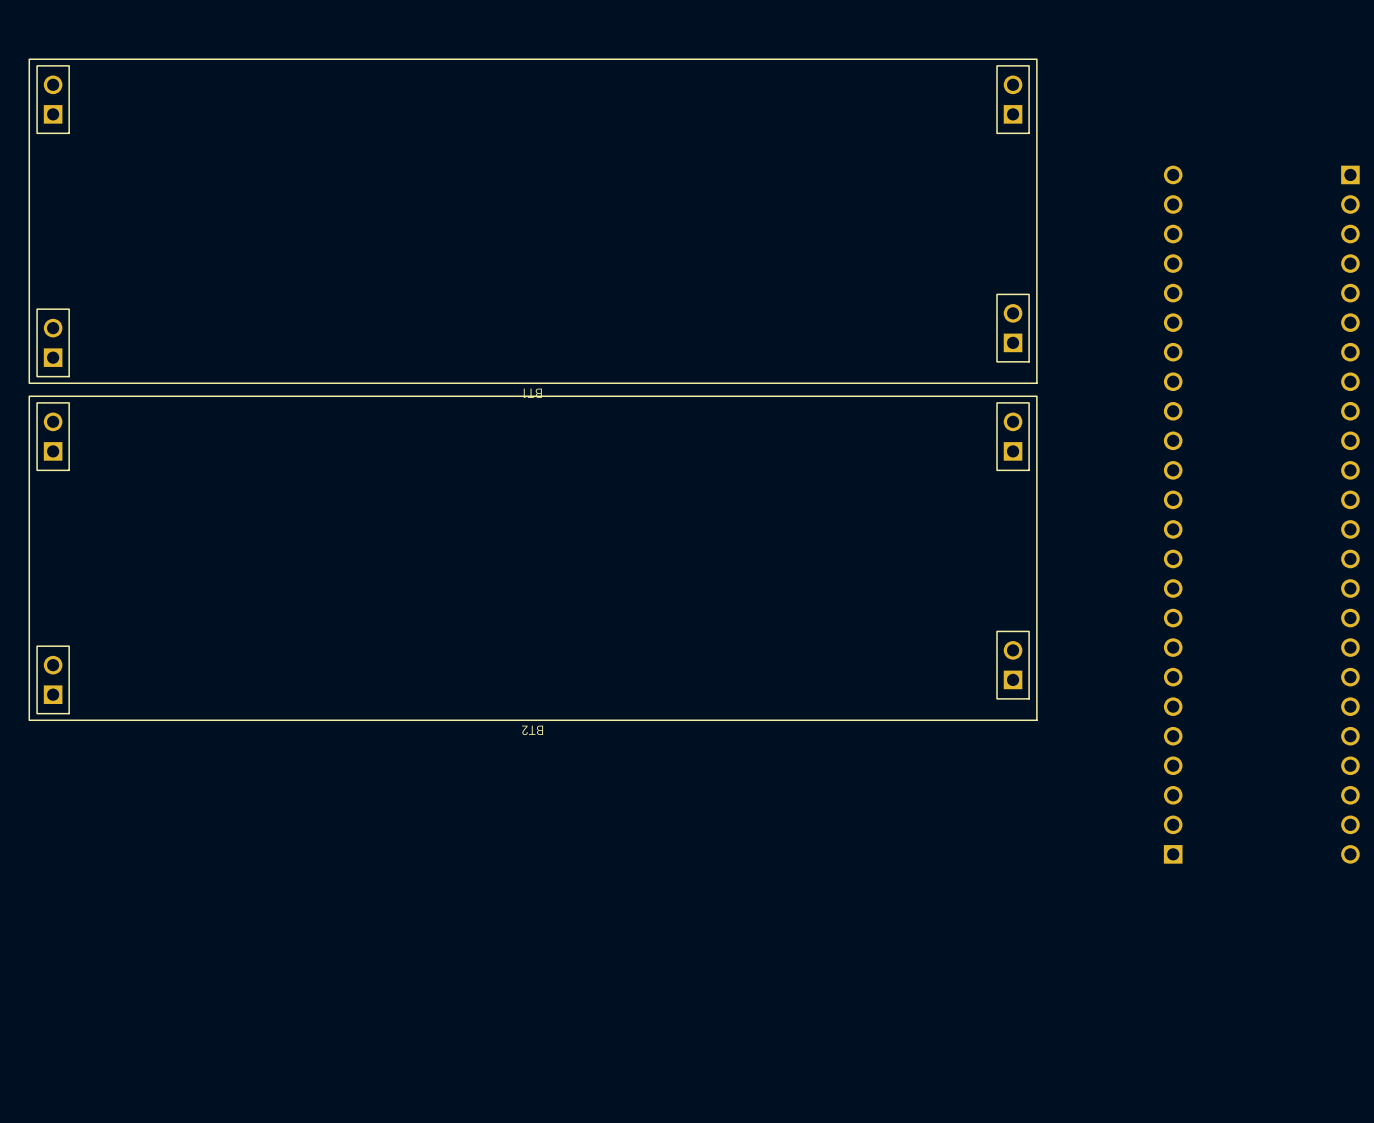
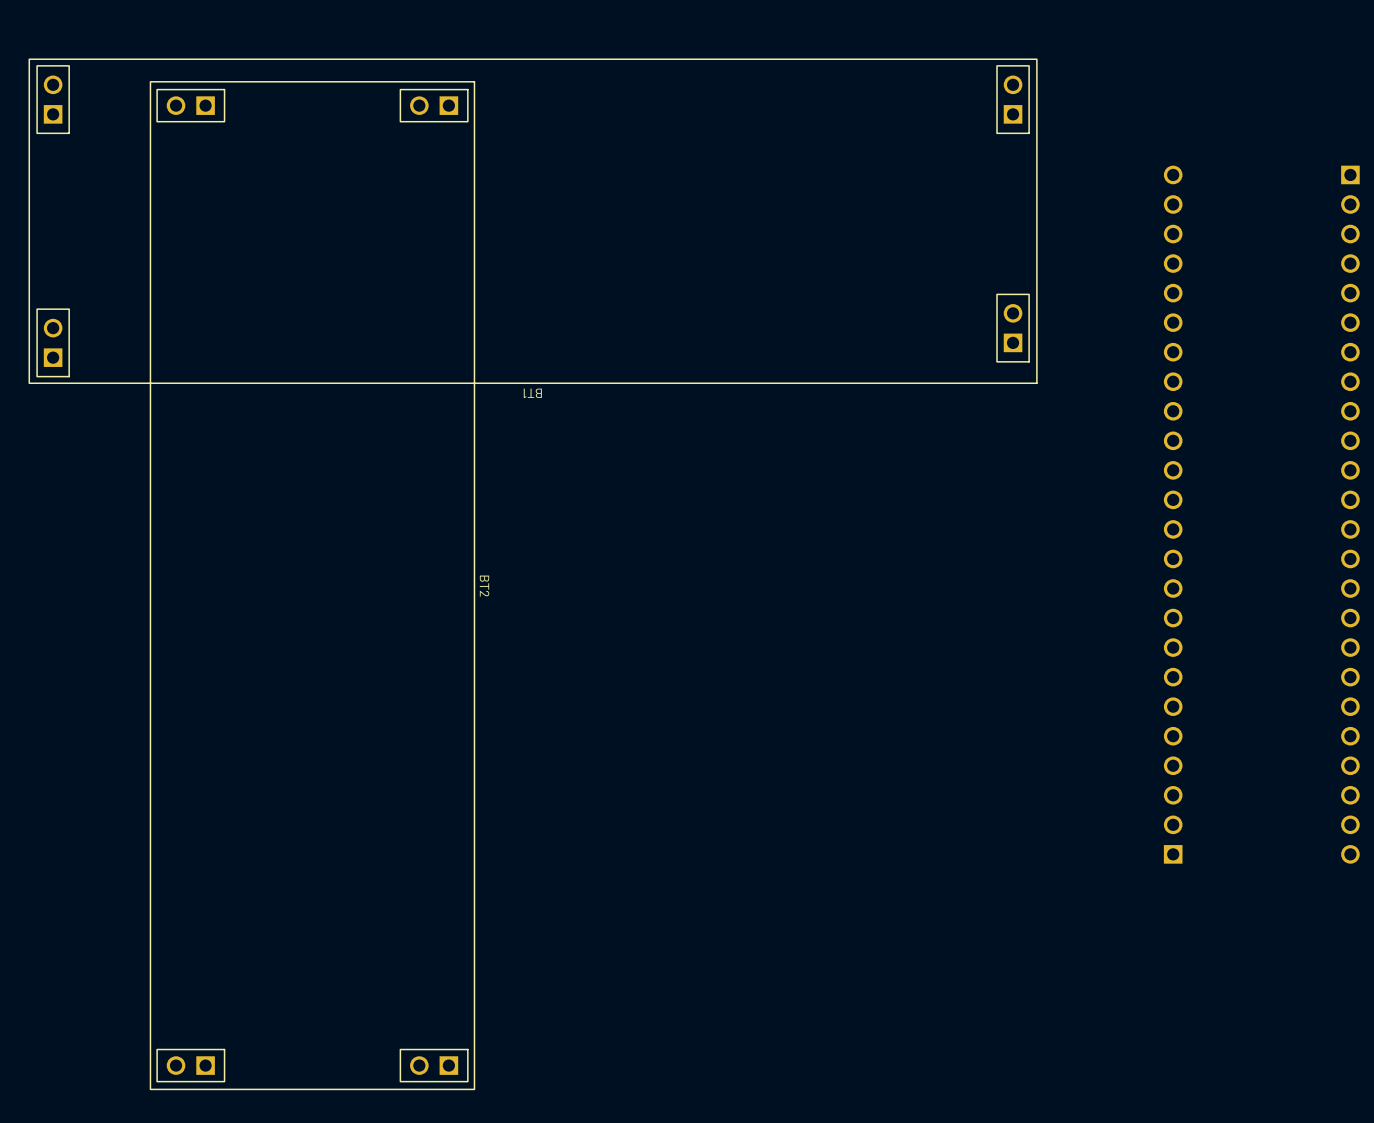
BT2 footprint: [28, 395, 1038, 721] -> [149, 81, 476, 1091]
BT2 name position: BT2 (532, 730) -> BT2 (484, 586)

